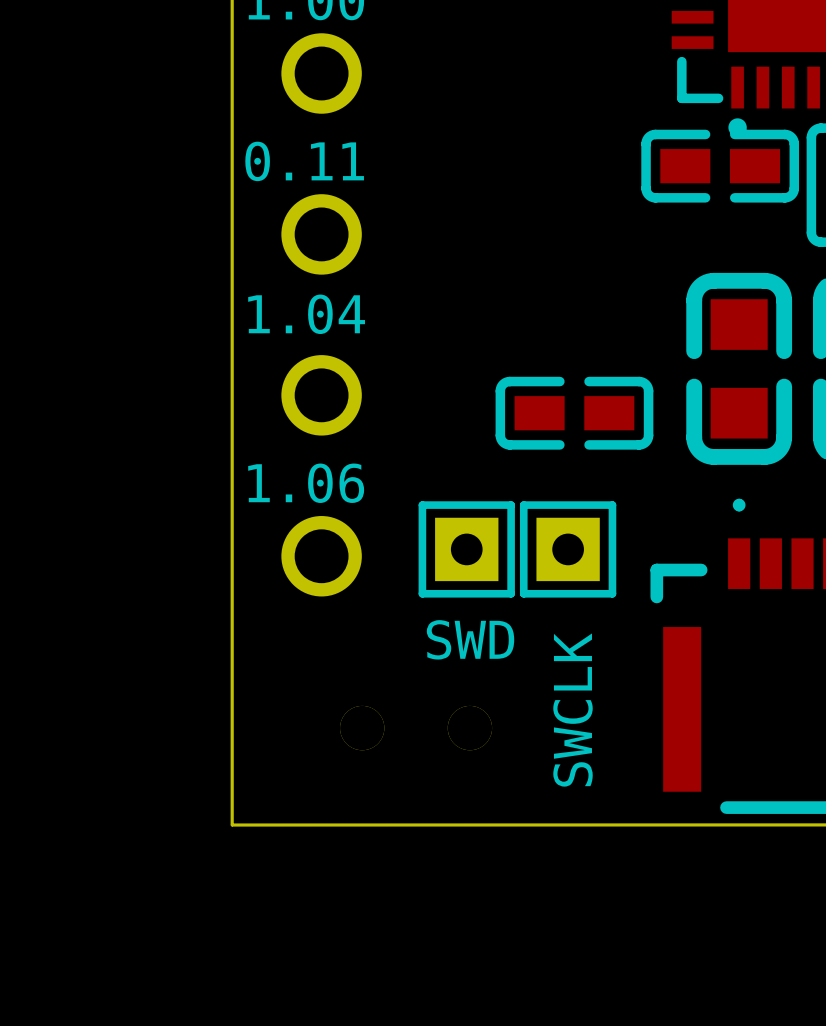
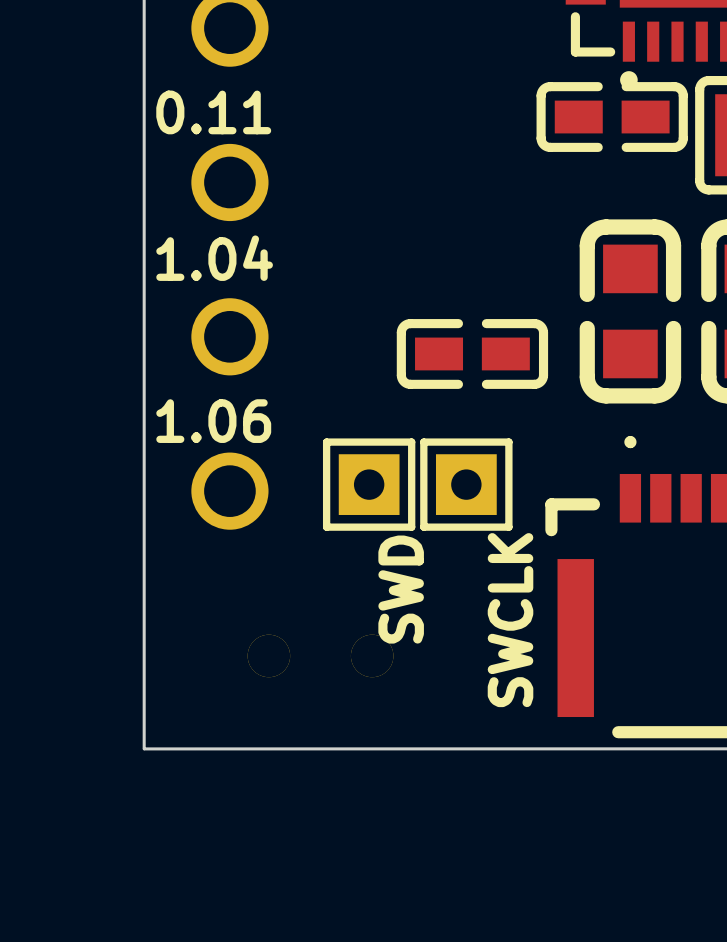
text rotation: 0° (470, 639) -> 90° counterclockwise (401, 589)
text position: SWCLK (573, 710) -> SWCLK (510, 620)

